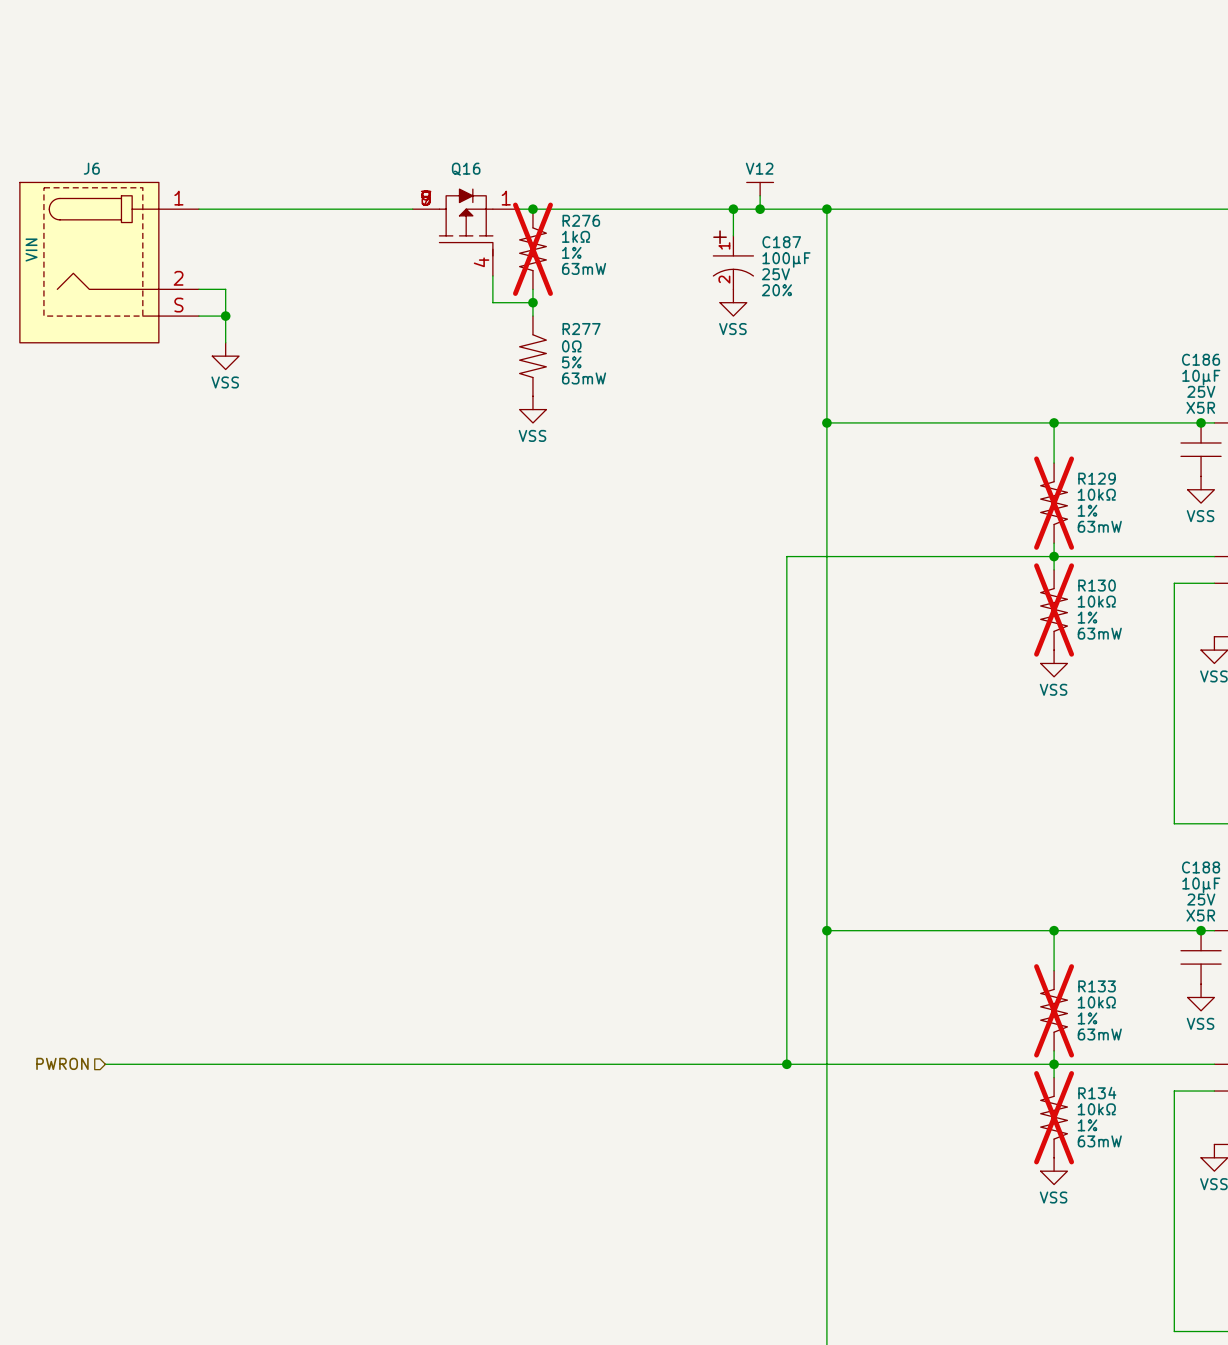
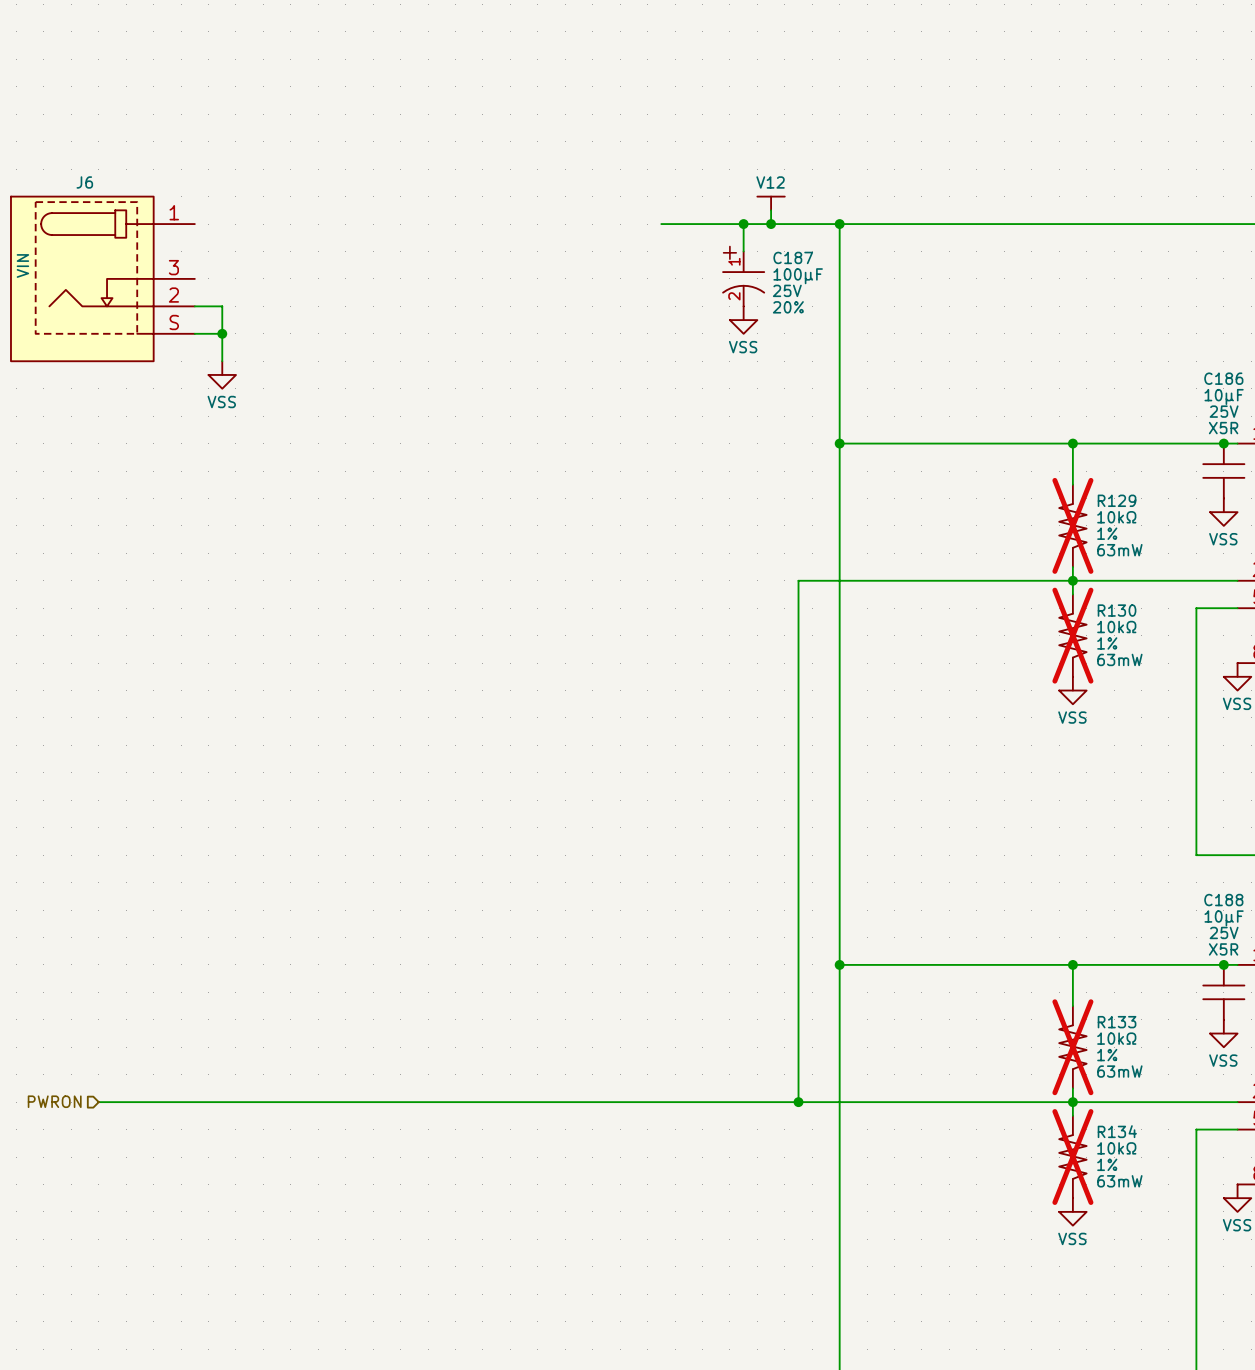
J6 symbol: [19, 182, 199, 343] -> [10, 196, 195, 362]
wire: (198, 209) (412, 209) -> none
wire: (519, 209) (653, 209) -> none
junction: (532, 209) -> none
Q16: (466, 232) -> none
R276: (532, 249) -> none
wire: (492, 275) (492, 302) (532, 302) -> none
wire: (532, 289) (532, 316) -> none
junction: (532, 302) -> none
R277: (532, 356) -> none
power symbol: VSS (532, 409) -> none

